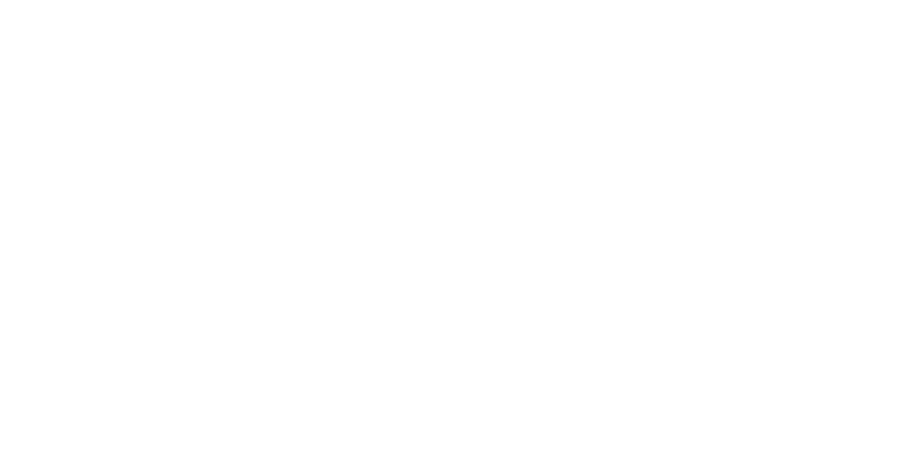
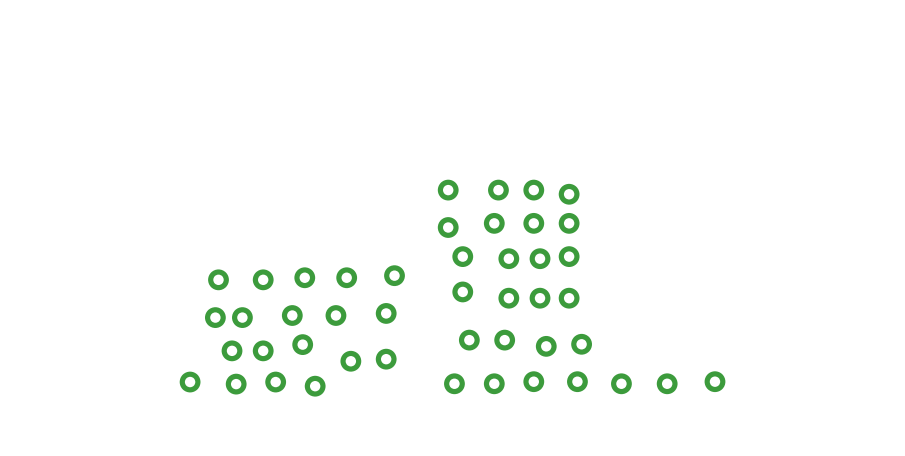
via: none -> (448, 190)
via: none -> (498, 190)
via: none -> (533, 190)
via: none -> (569, 194)
via: none -> (494, 223)
via: none -> (533, 223)
via: none -> (569, 223)
via: none -> (448, 227)
via: none -> (462, 256)
via: none -> (569, 256)
via: none -> (508, 258)
via: none -> (540, 258)
via: none -> (394, 275)
via: none -> (304, 277)
via: none -> (346, 277)
via: none -> (218, 279)
via: none -> (263, 279)
via: none -> (462, 291)
via: none -> (508, 298)
via: none -> (540, 298)
via: none -> (569, 298)
via: none -> (386, 313)
via: none -> (292, 315)
via: none -> (335, 315)
via: none -> (215, 317)
via: none -> (242, 317)
via: none -> (469, 340)
via: none -> (504, 340)
via: none -> (302, 344)
via: none -> (581, 344)
via: none -> (546, 346)
via: none -> (232, 350)
via: none -> (263, 350)
via: none -> (386, 359)
via: none -> (350, 361)
via: none -> (533, 381)
via: none -> (577, 381)
via: none -> (714, 381)
via: none -> (190, 382)
via: none -> (275, 382)
via: none -> (454, 383)
via: none -> (494, 383)
via: none -> (621, 383)
via: none -> (667, 383)
via: none -> (236, 384)
via: none -> (315, 386)

